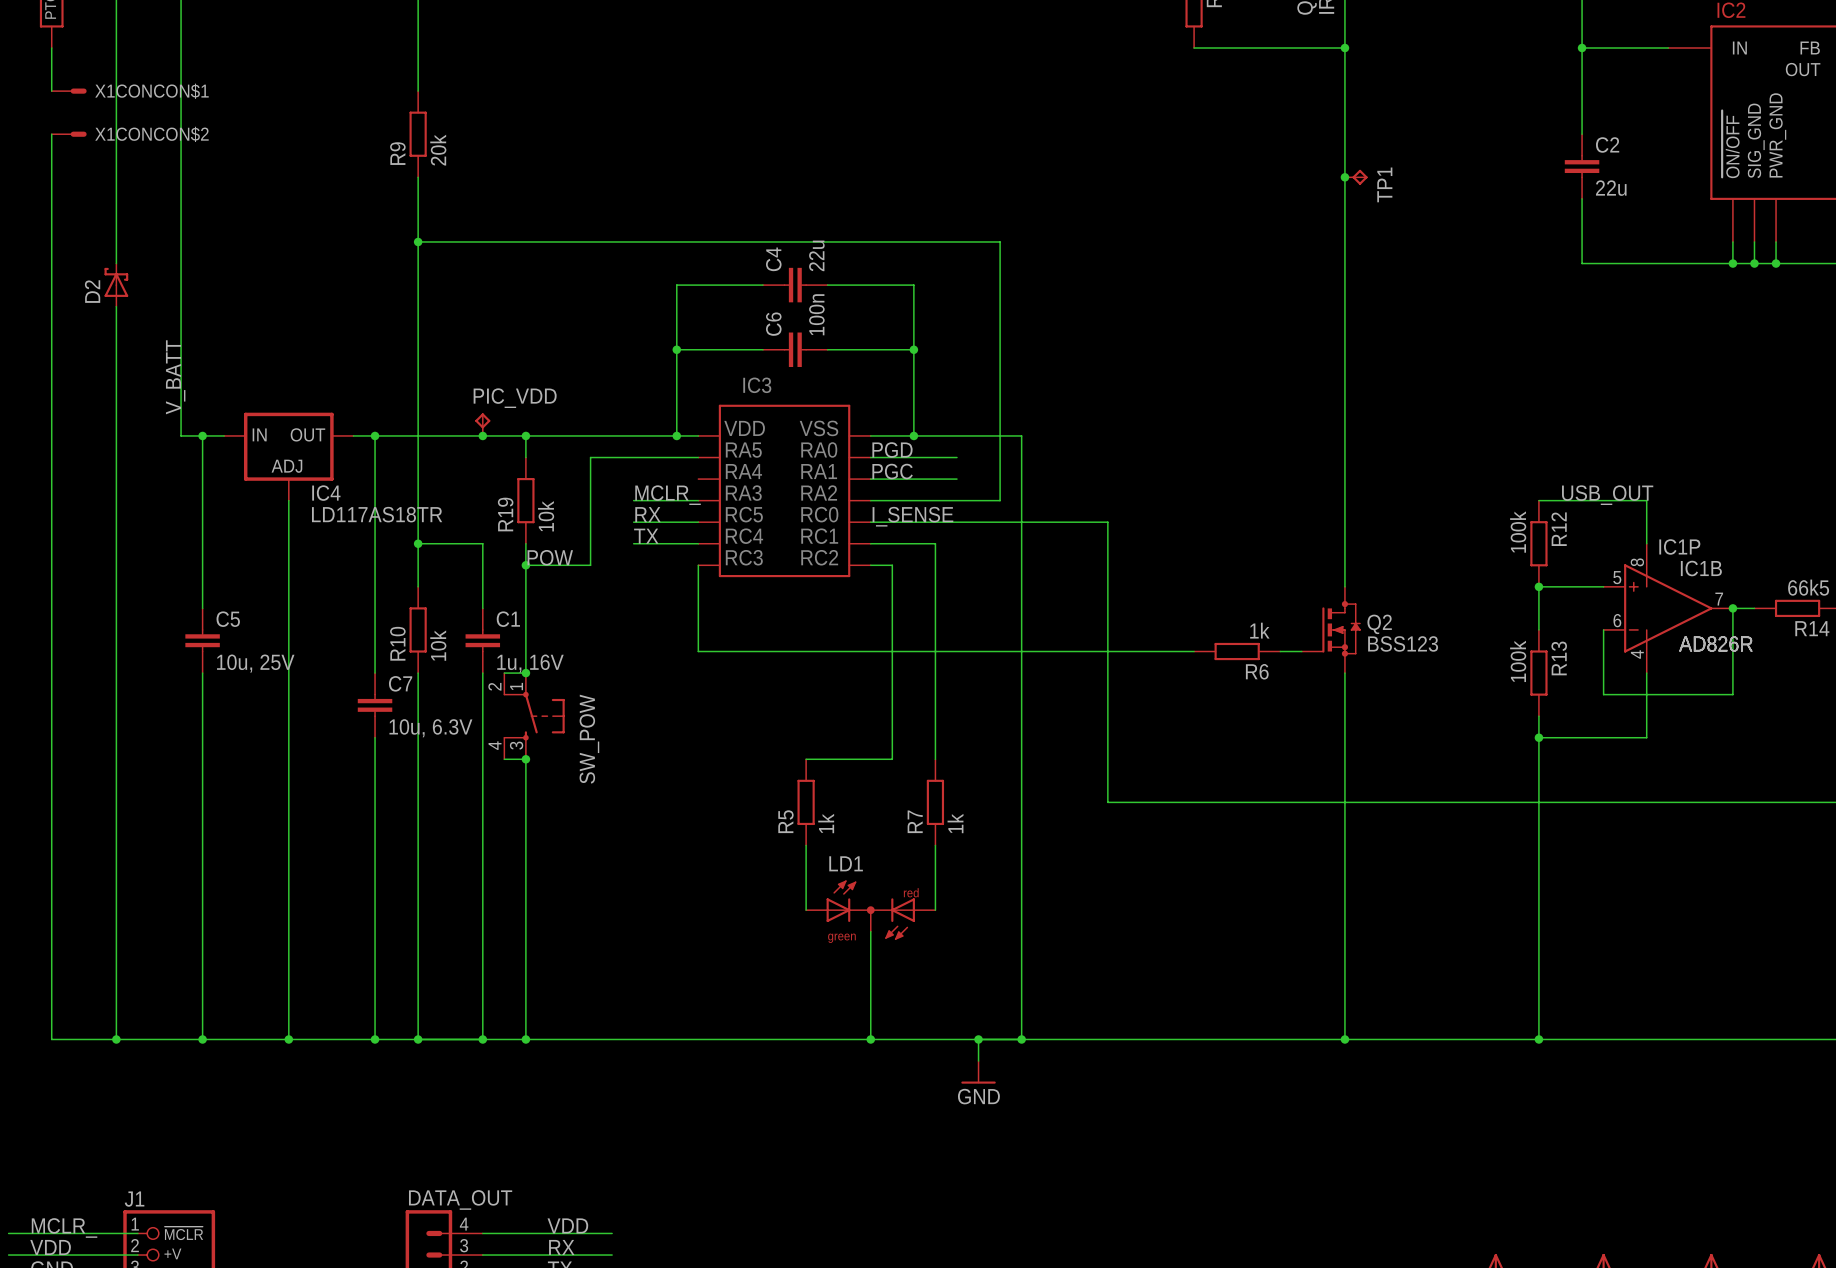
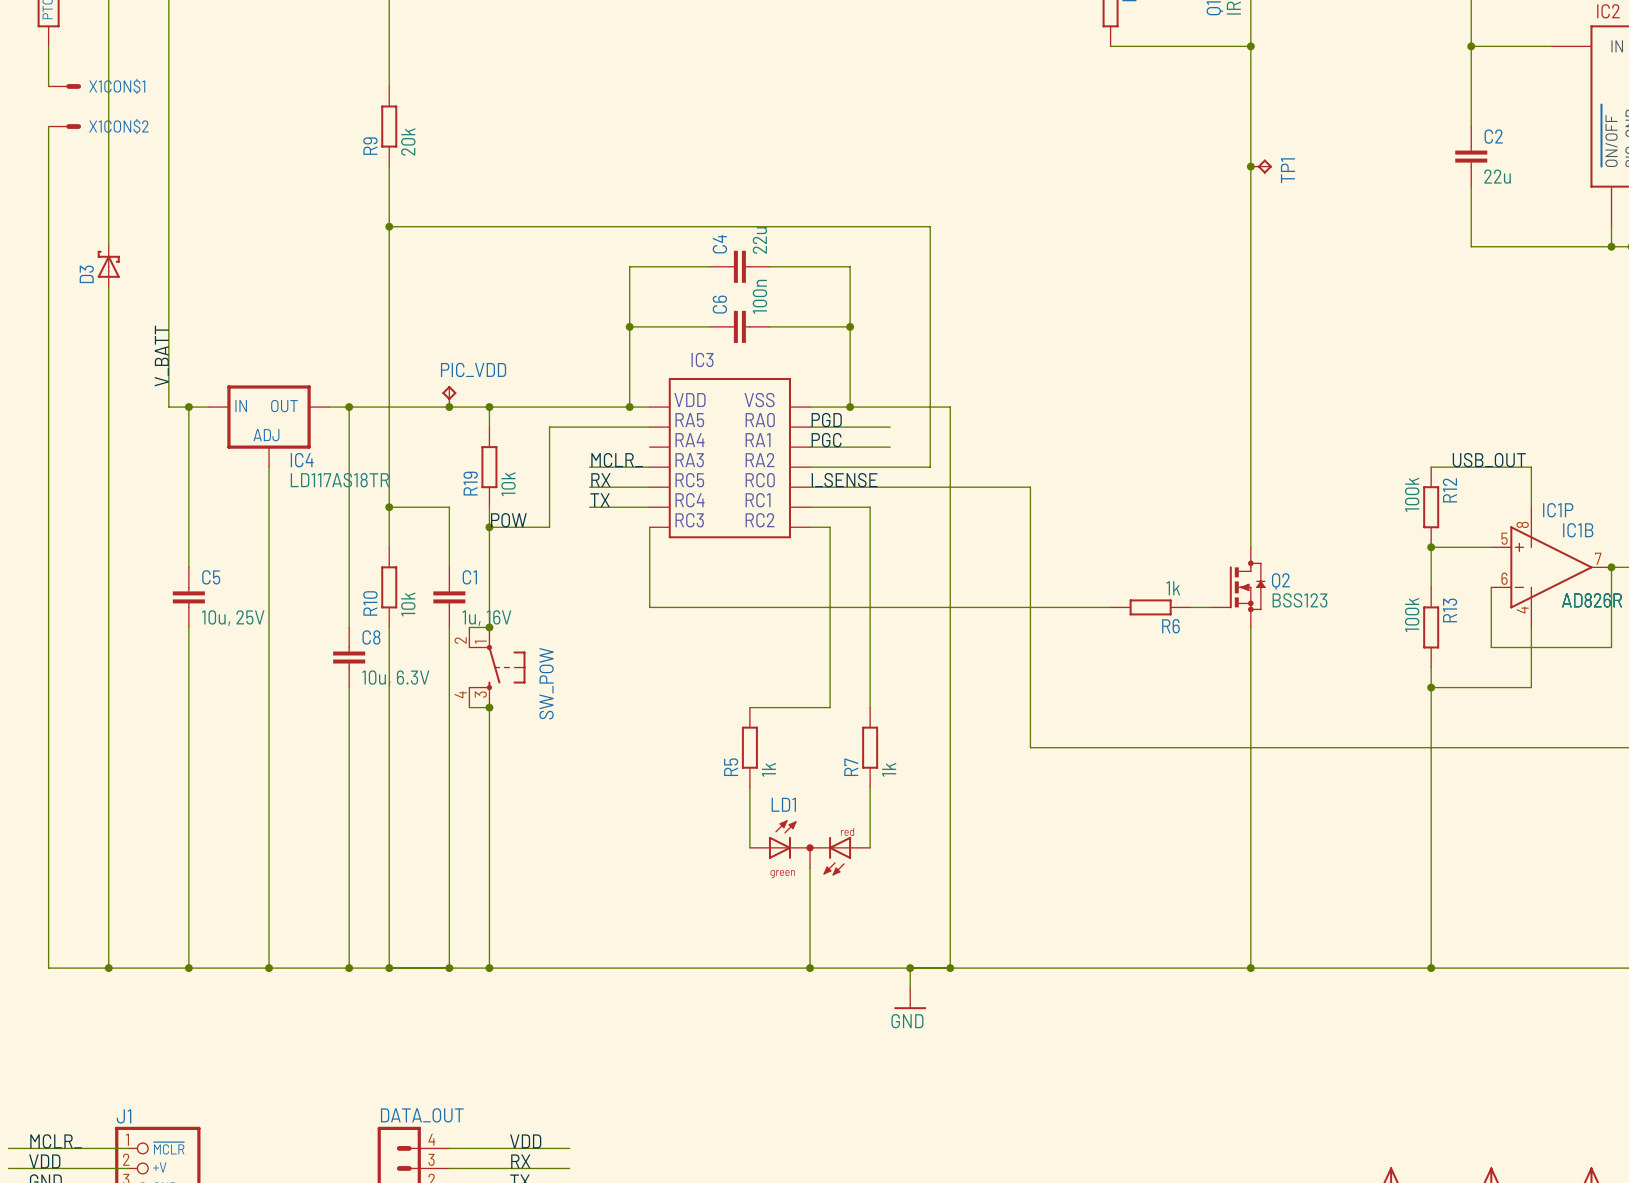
X1CONCON$1 name: X1CONCON$1 (151, 91) -> X1CON$1 (117, 86)
X1CONCON$2 name: X1CONCON$2 (151, 134) -> X1CON$2 (118, 126)
D2 name: D2 (92, 291) -> D3 (86, 274)
C7 name: C7 (400, 683) -> C8 (371, 637)

